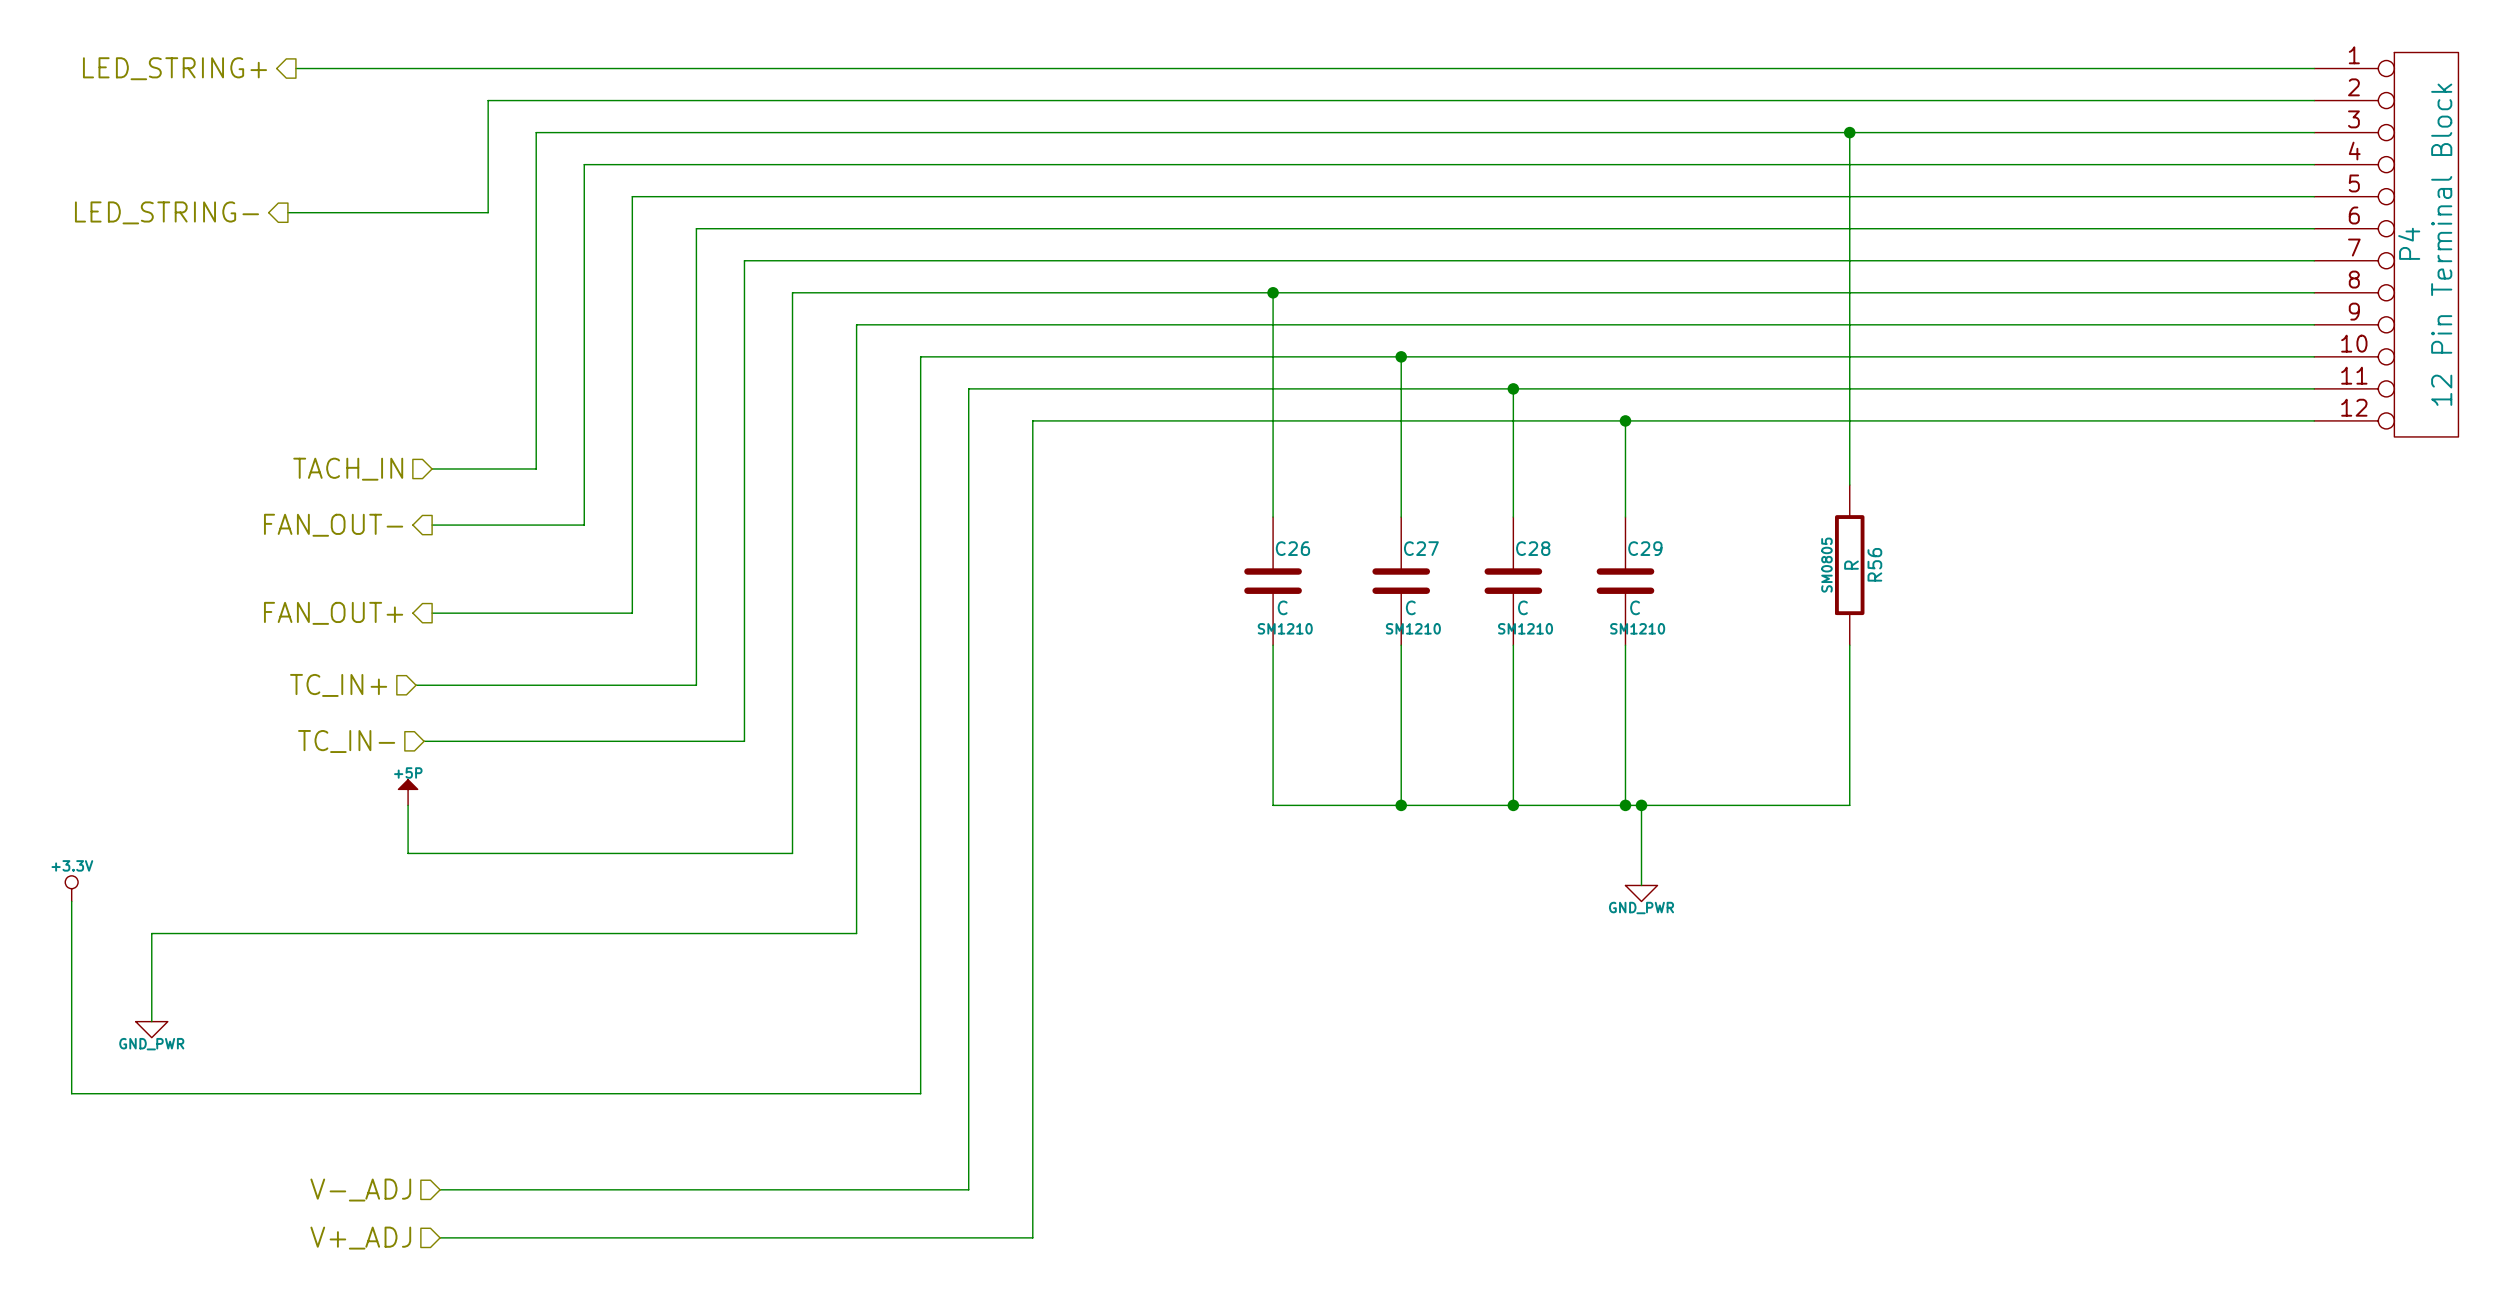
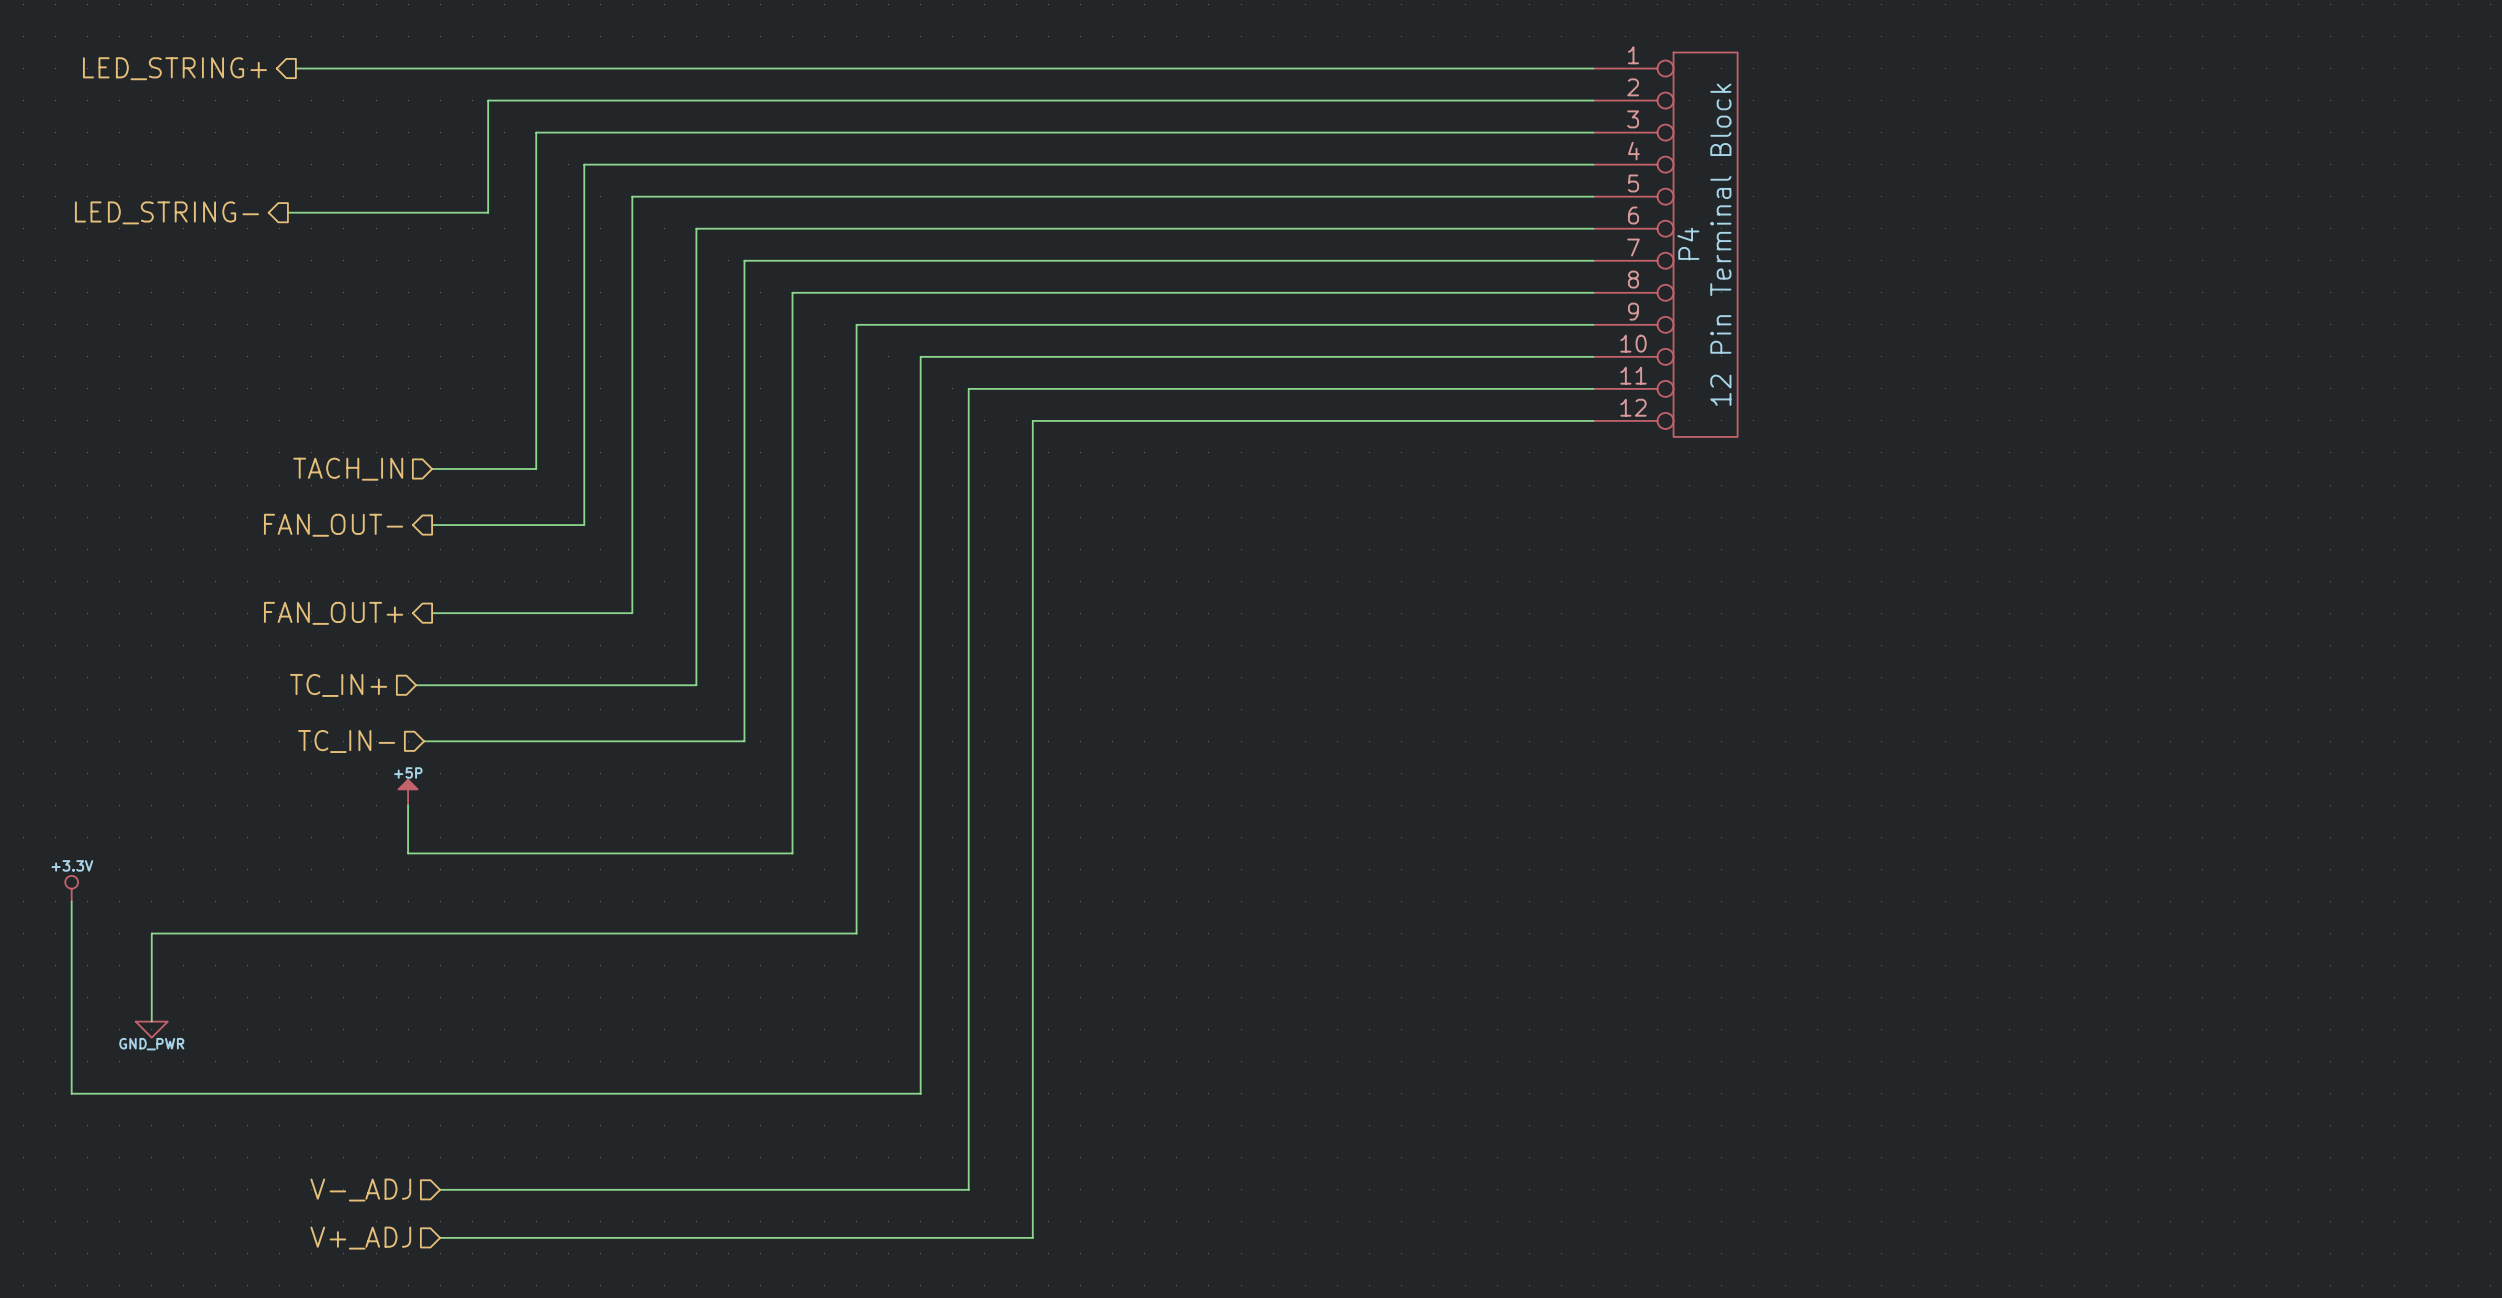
wire: (1593, 68) (2314, 68) -> none
wire: (1593, 100) (2314, 100) -> none
wire: (1593, 132) (2314, 132) -> none
wire: (1849, 132) (1849, 485) -> none
junction: (1849, 132) -> none
wire: (1593, 164) (2314, 164) -> none
wire: (1593, 196) (2314, 196) -> none
wire: (1593, 228) (2314, 228) -> none
P4 position: (2386, 244) -> (1665, 244)
wire: (1593, 260) (2314, 260) -> none
wire: (1273, 292) (1273, 517) -> none
junction: (1273, 292) -> none
wire: (1593, 292) (2314, 292) -> none
wire: (1593, 324) (2314, 324) -> none
wire: (1401, 356) (1401, 517) -> none
junction: (1401, 356) -> none
wire: (1593, 356) (2314, 356) -> none
wire: (1513, 388) (1513, 517) -> none
junction: (1513, 388) -> none
wire: (1593, 388) (2314, 388) -> none
wire: (1593, 420) (2314, 420) -> none
wire: (1625, 420) (1625, 517) -> none
junction: (1625, 420) -> none
R56: R (1849, 565) -> none
C26: C (1273, 581) -> none
C27: C (1401, 581) -> none
C28: C (1513, 581) -> none
C29: C (1625, 581) -> none
wire: (1273, 645) (1273, 805) (1849, 805) (1849, 645) -> none
wire: (1401, 645) (1401, 805) -> none
wire: (1513, 645) (1513, 805) -> none
wire: (1625, 645) (1625, 805) -> none
junction: (1401, 805) -> none
junction: (1513, 805) -> none
junction: (1625, 805) -> none
wire: (1641, 805) (1641, 885) -> none
junction: (1641, 805) -> none
power symbol: GND_PWR (1641, 893) -> none

